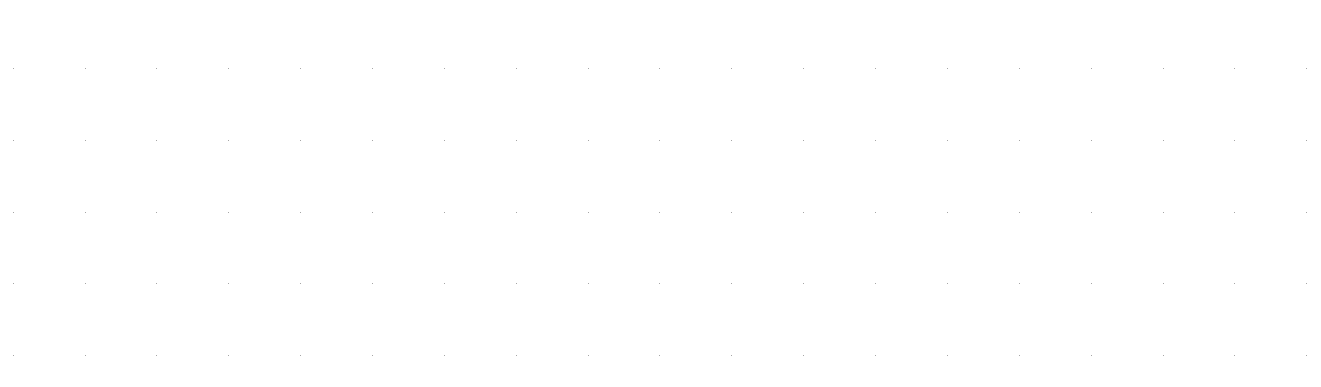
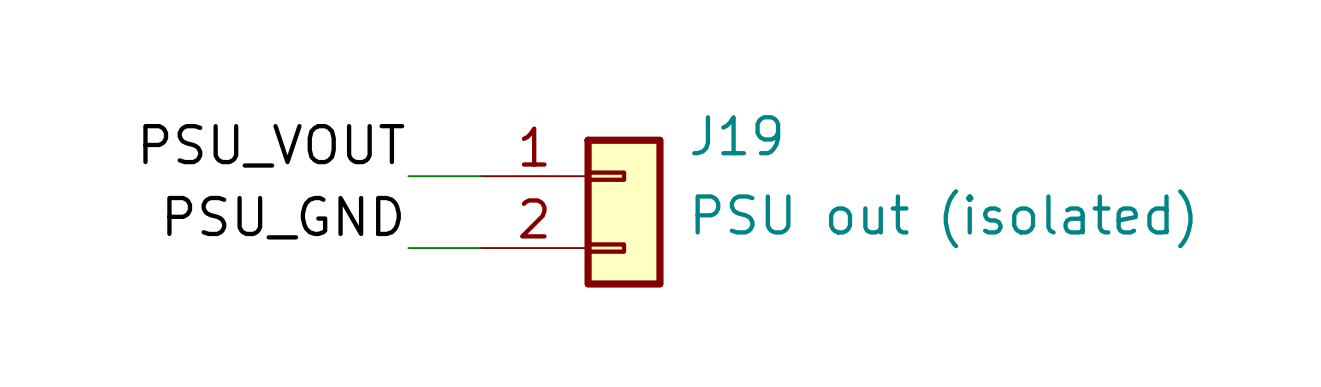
label: none -> PSU_VOUT (273, 145)
wire: none -> (408, 176) (480, 176)
J19: none -> PSU out (isolated) (571, 212)
label: none -> PSU_GND (284, 217)
wire: none -> (408, 248) (480, 248)

